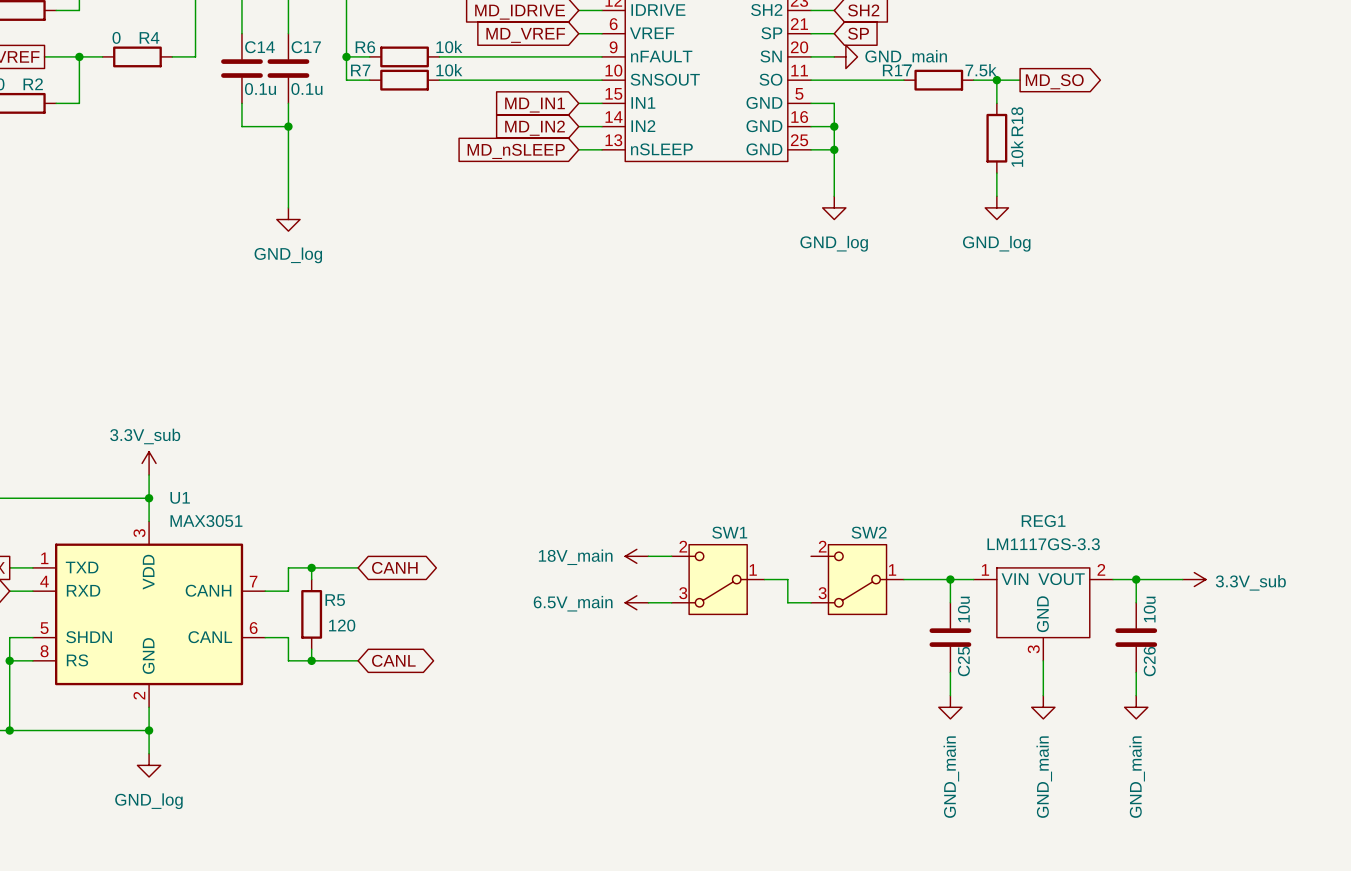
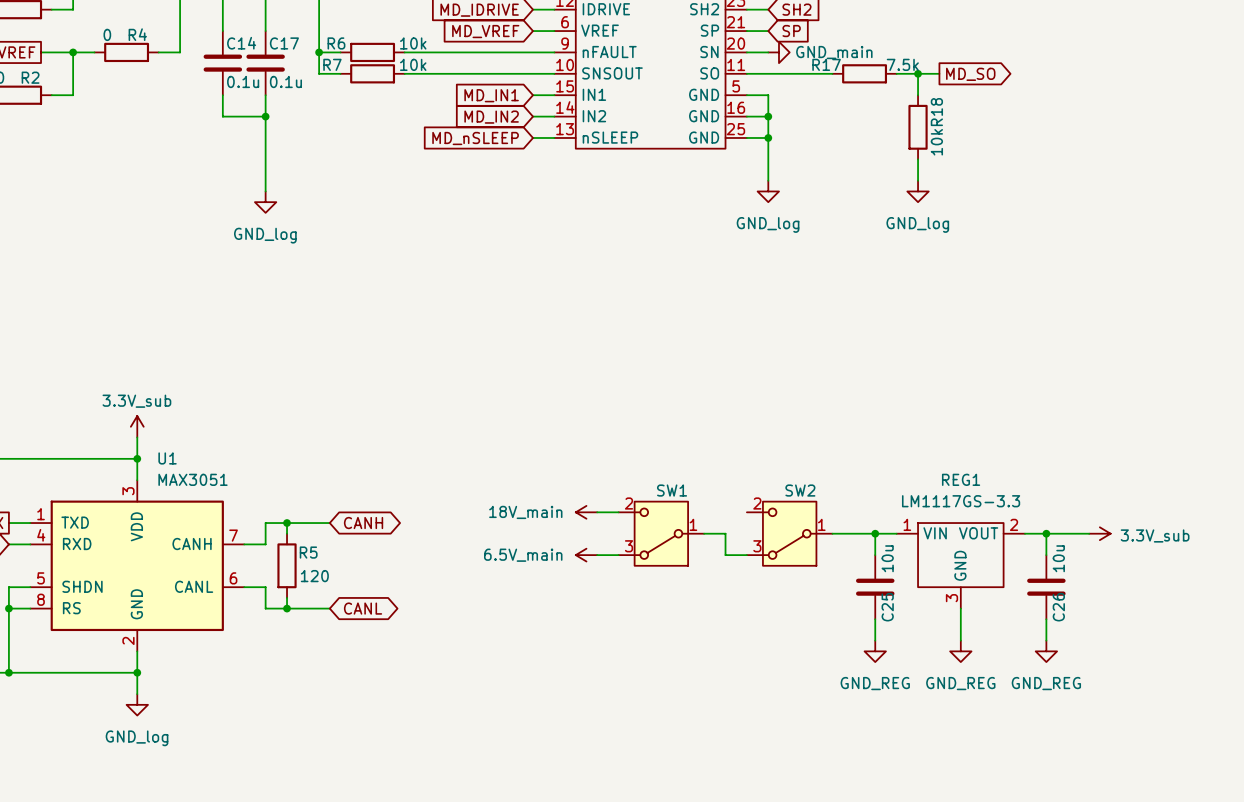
power symbol: GND_main (950, 707) -> GND_REG (875, 651)
power symbol: GND_main (1043, 707) -> GND_REG (960, 651)
power symbol: GND_main (1136, 707) -> GND_REG (1046, 651)

